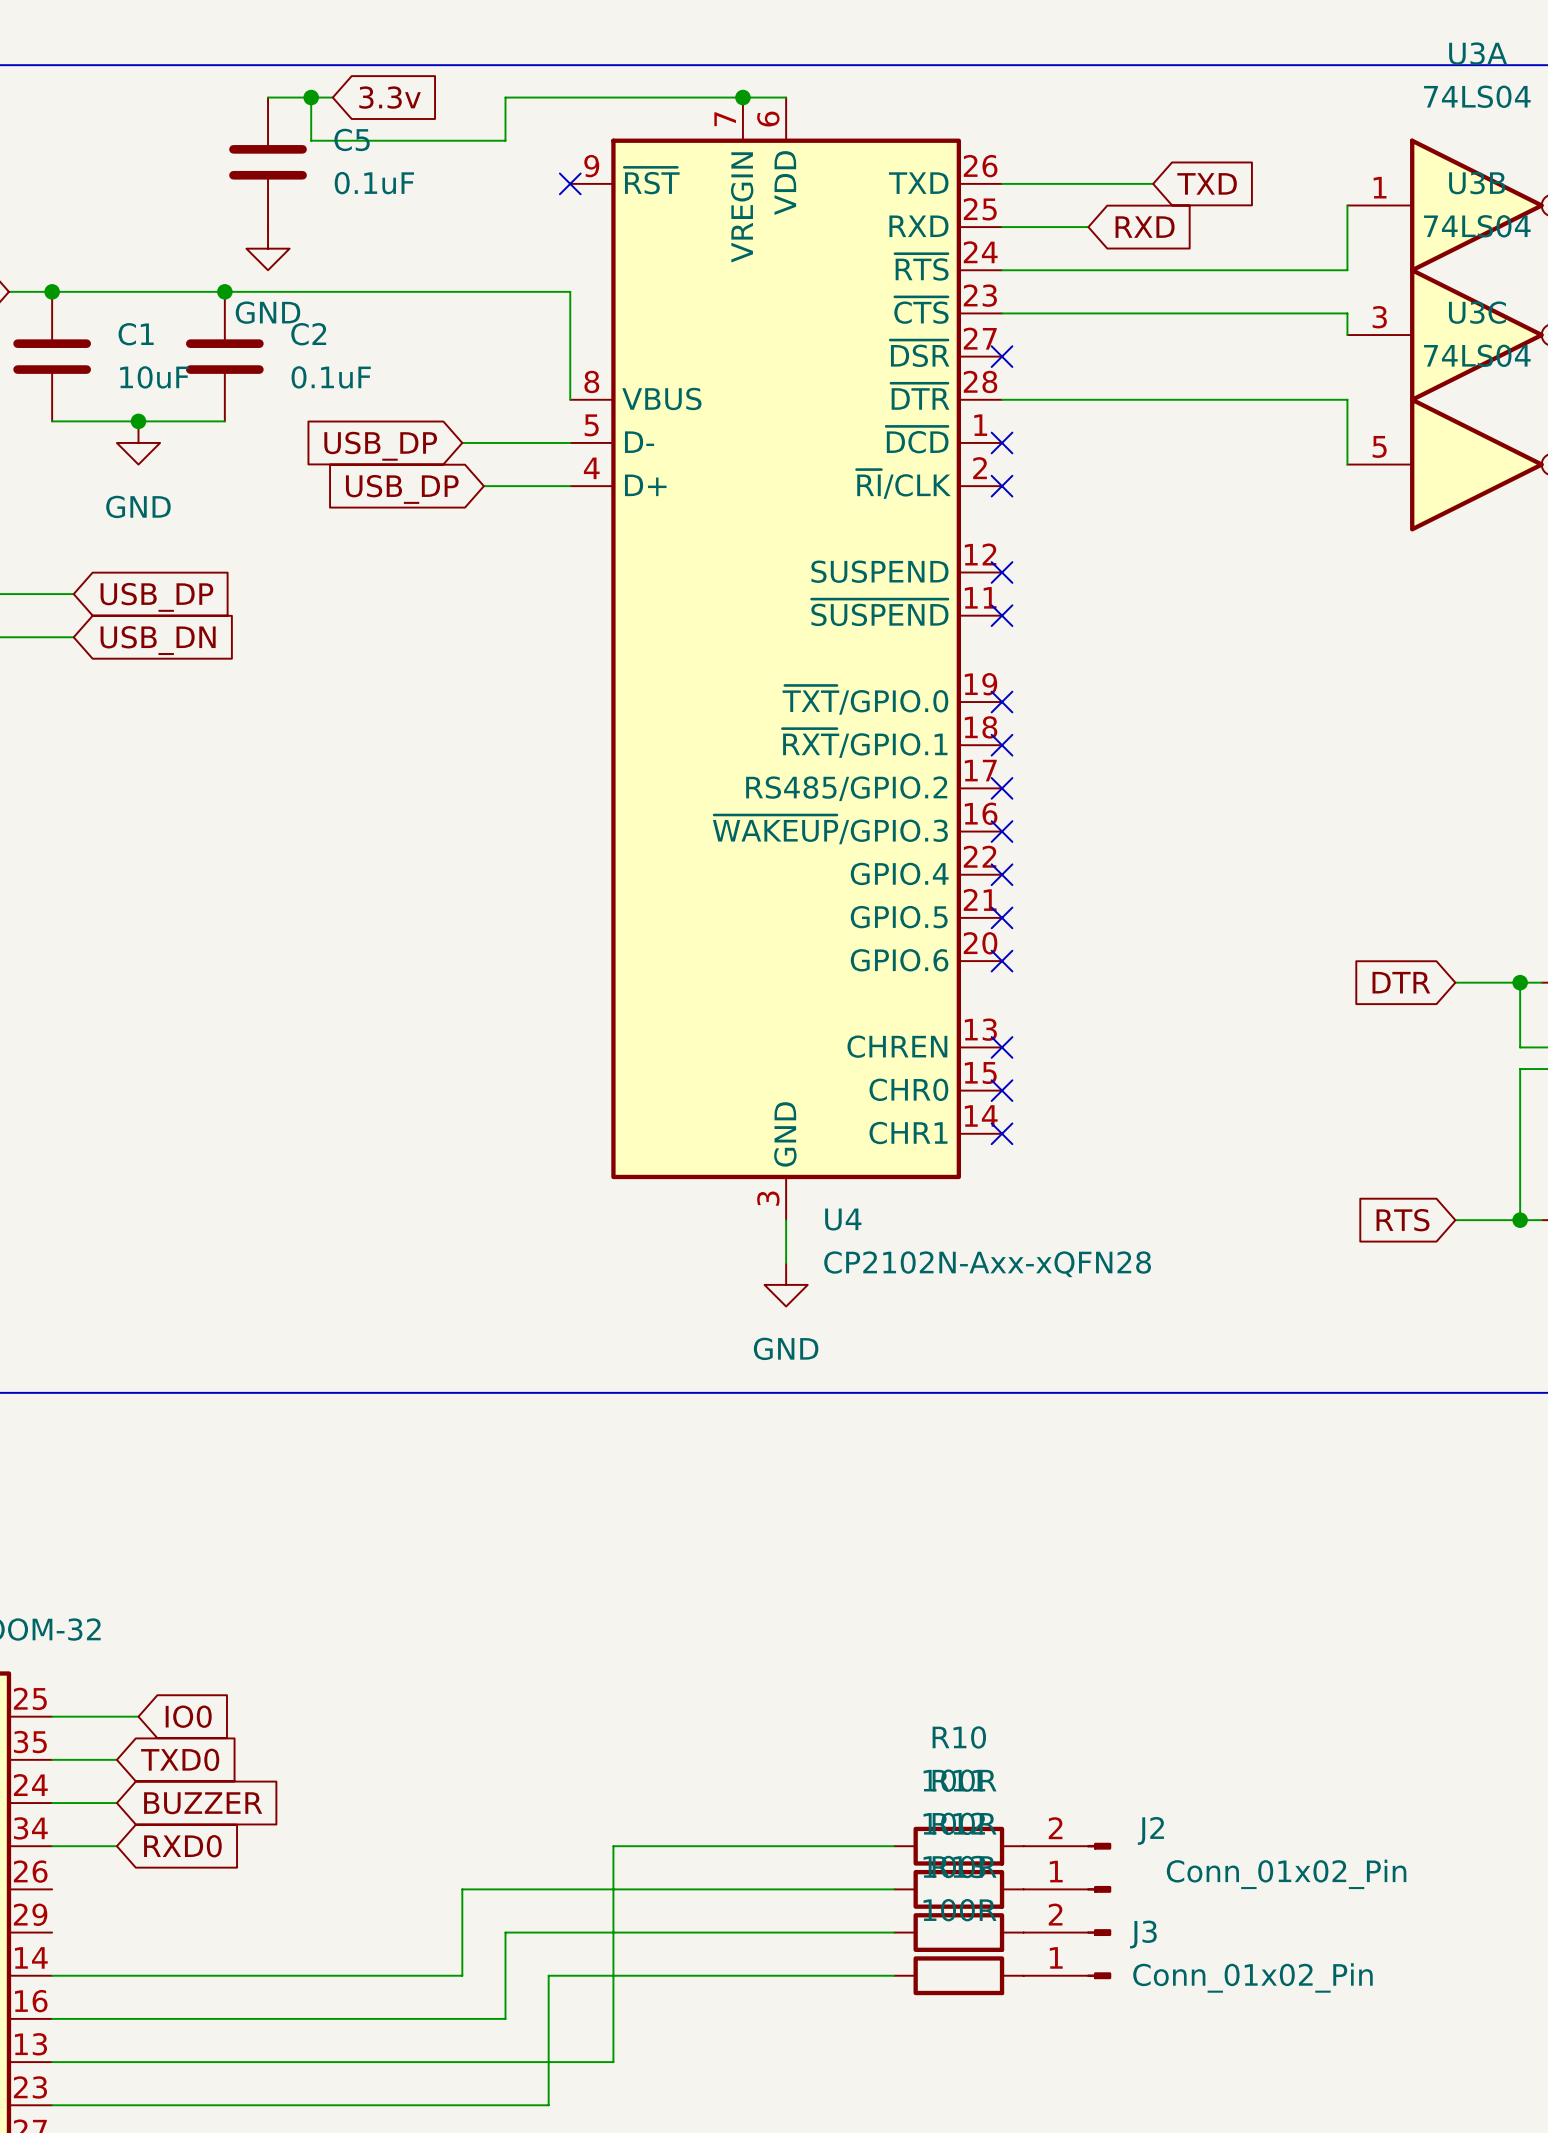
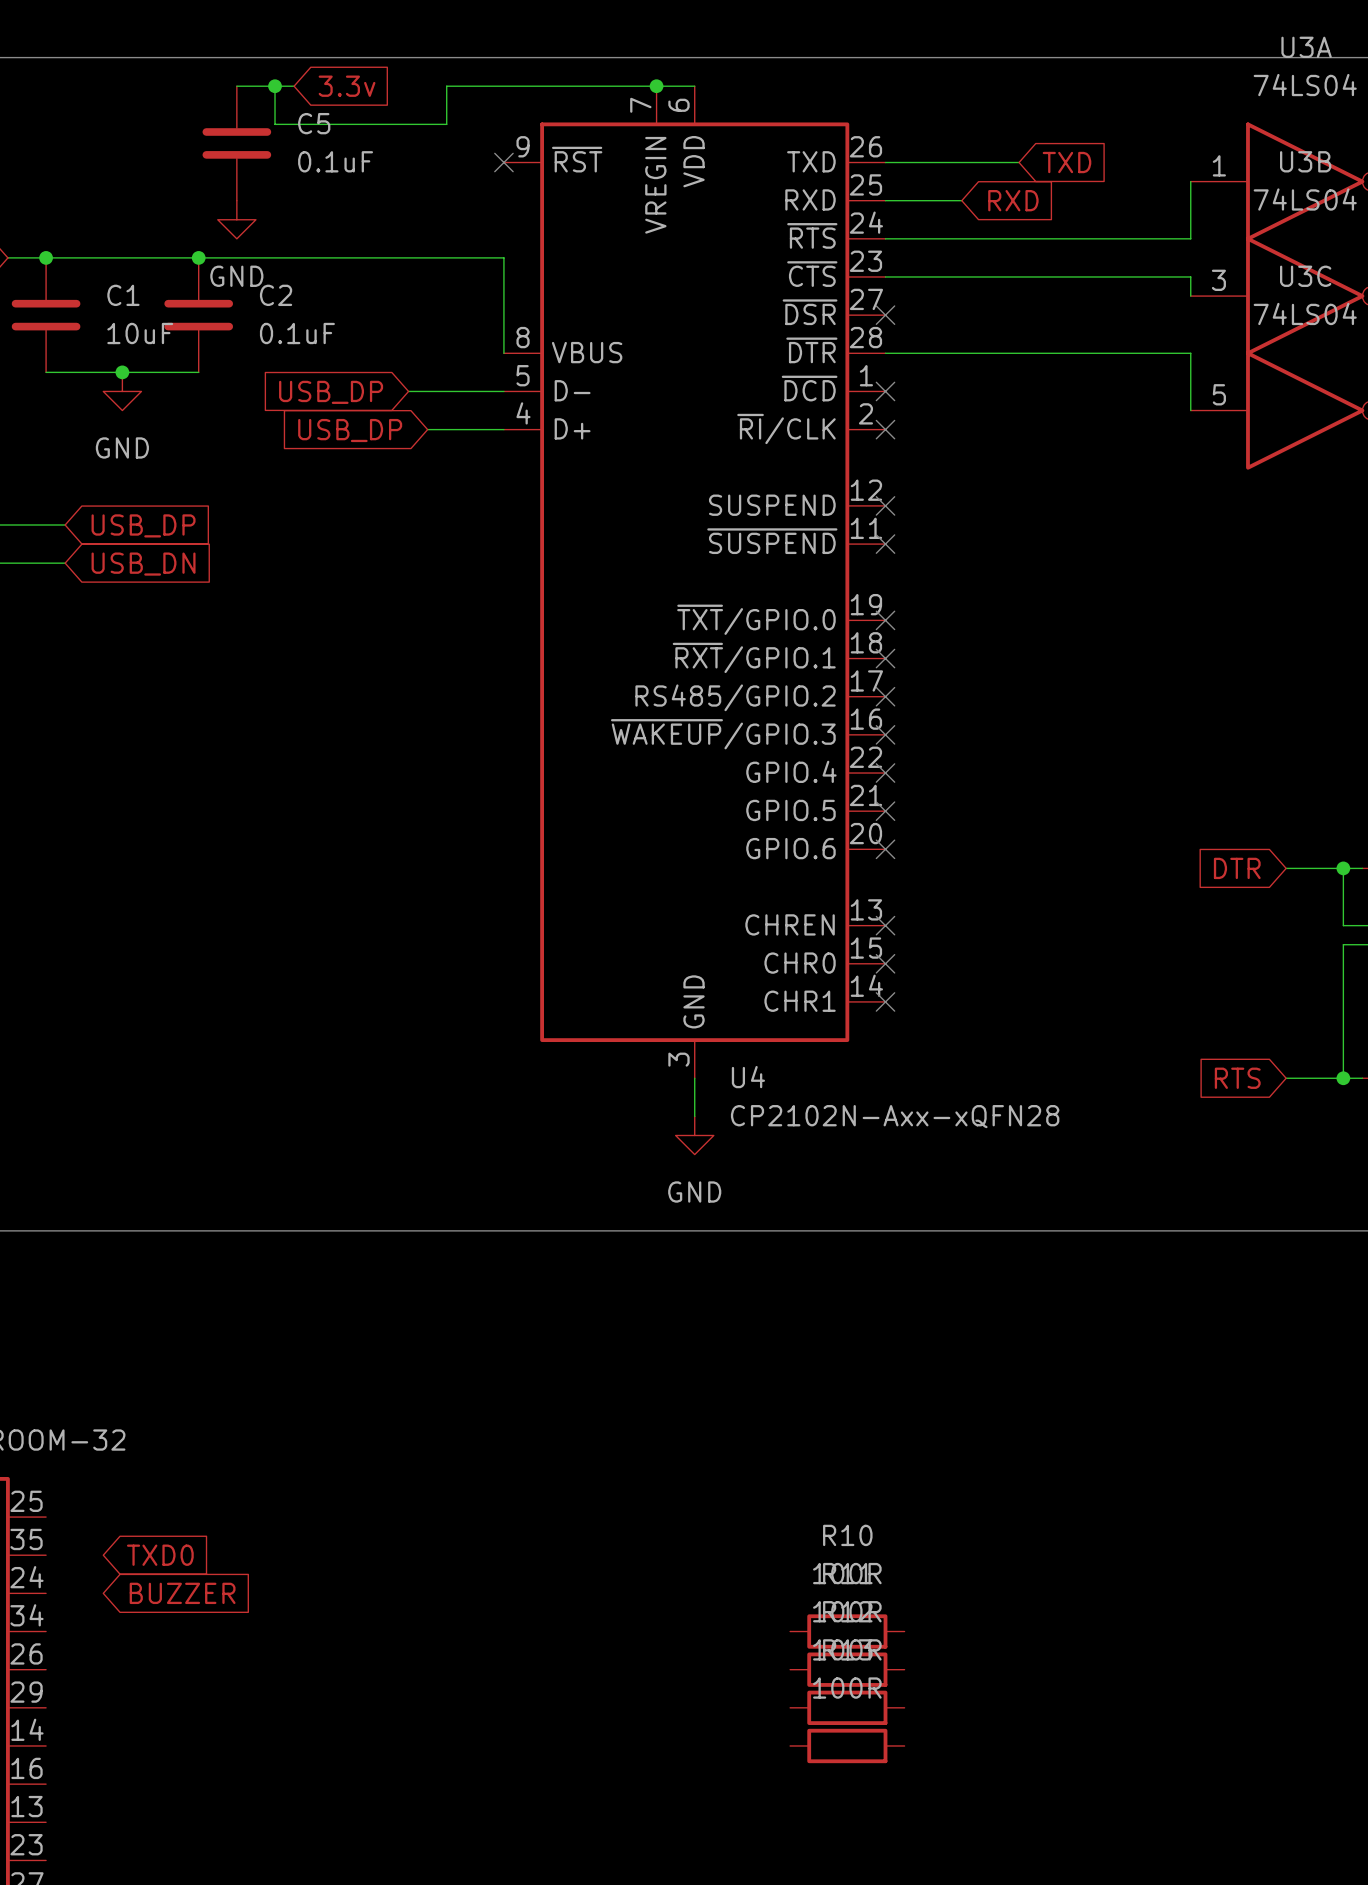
wire: (52, 1716) (138, 1716) -> none
global label: IO0 (188, 1716) -> none
wire: (52, 1759) (116, 1759) -> none
wire: (52, 1803) (116, 1803) -> none
wire: (52, 1846) (116, 1846) -> none
global label: RXD0 (182, 1846) -> none
wire: (894, 1846) (613, 1846) (613, 2062) (52, 2062) -> none
J2: Conn_01x02_Pin (1067, 1867) -> none
wire: (894, 1889) (462, 1889) (462, 1975) (52, 1975) -> none
wire: (894, 1932) (505, 1932) (505, 2018) (52, 2018) -> none
J3: Conn_01x02_Pin (1067, 1954) -> none
wire: (894, 1975) (548, 1975) (548, 2105) (52, 2105) -> none

